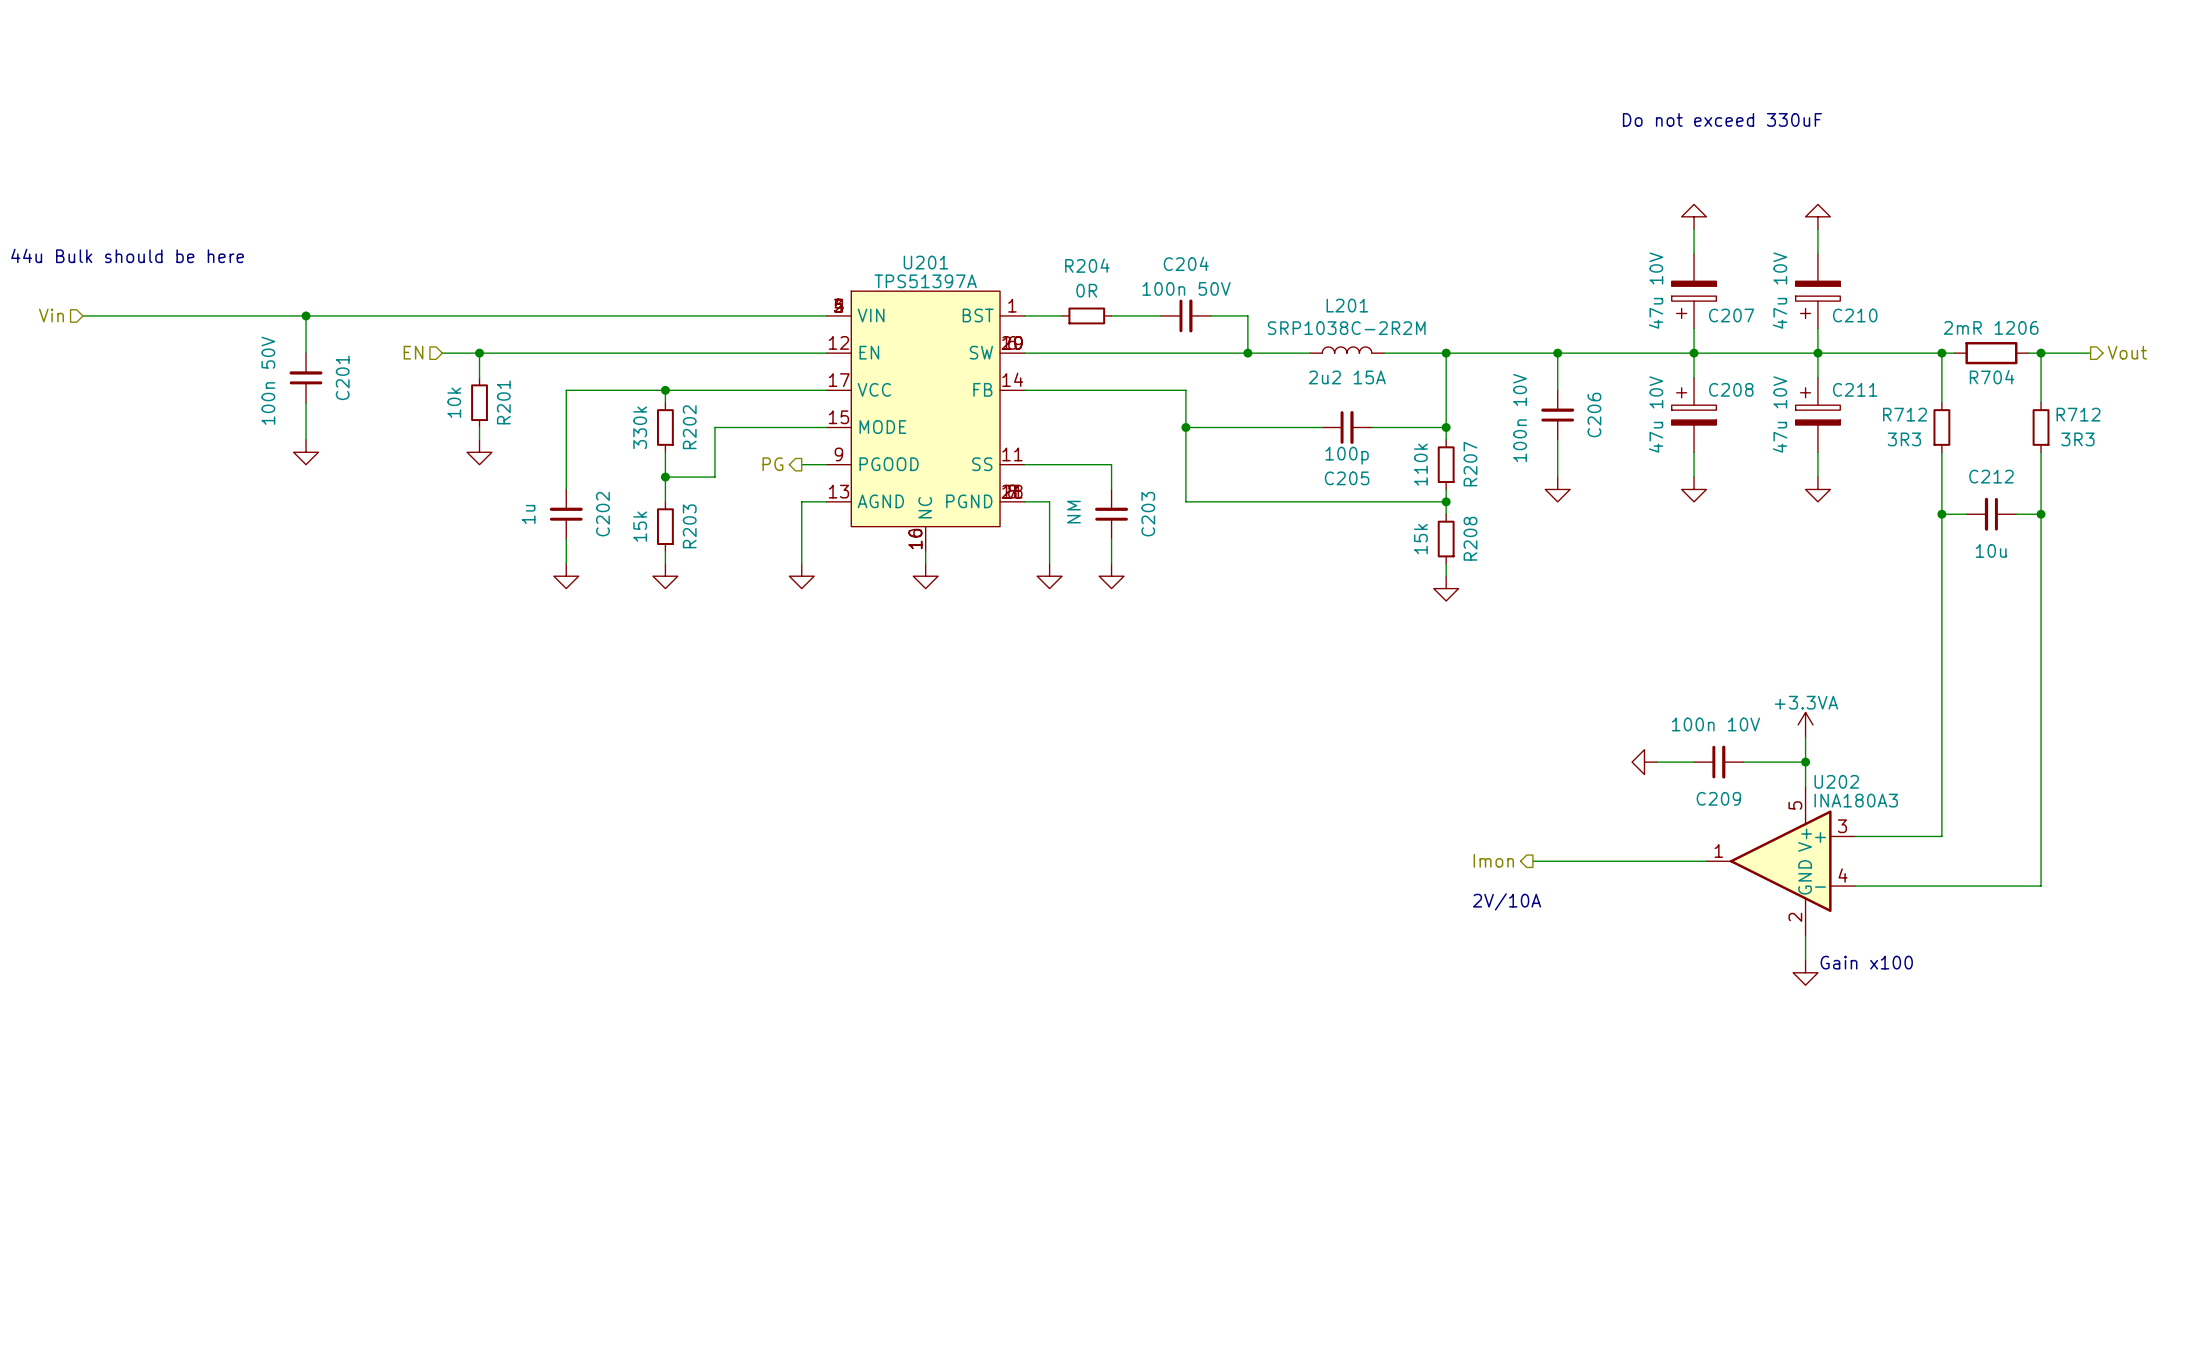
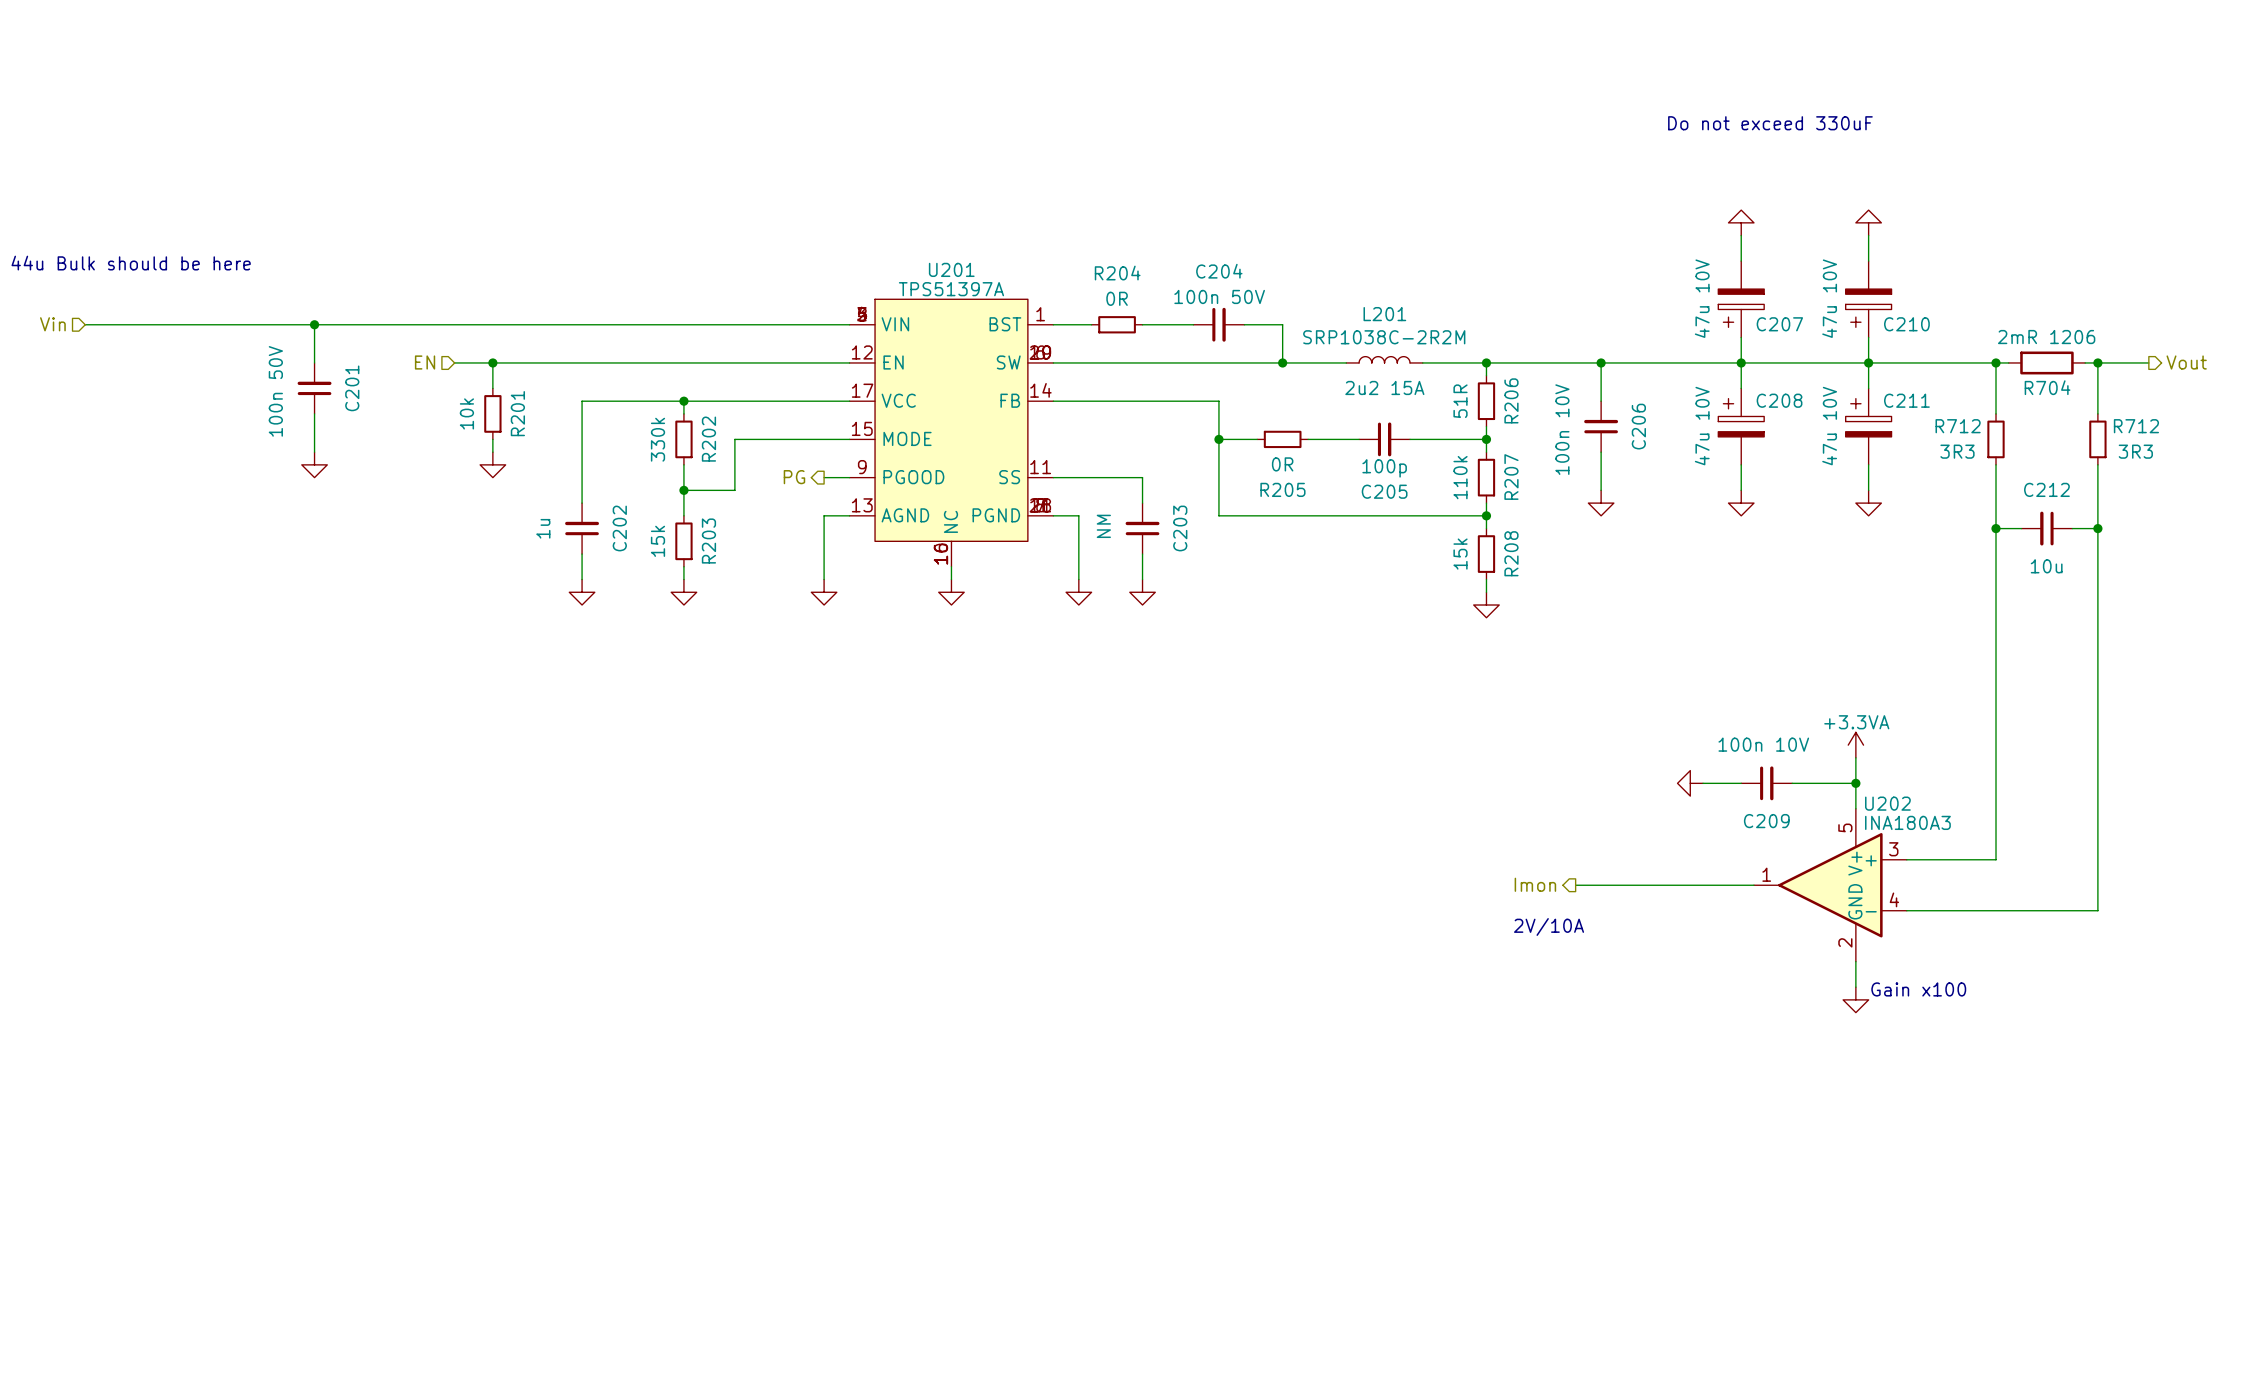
wire: (1446, 365) (1446, 415) -> none
R206: none -> 51R (1486, 401)
wire: (1223, 427) (1272, 427) -> none
R205: none -> 0R (1282, 439)

